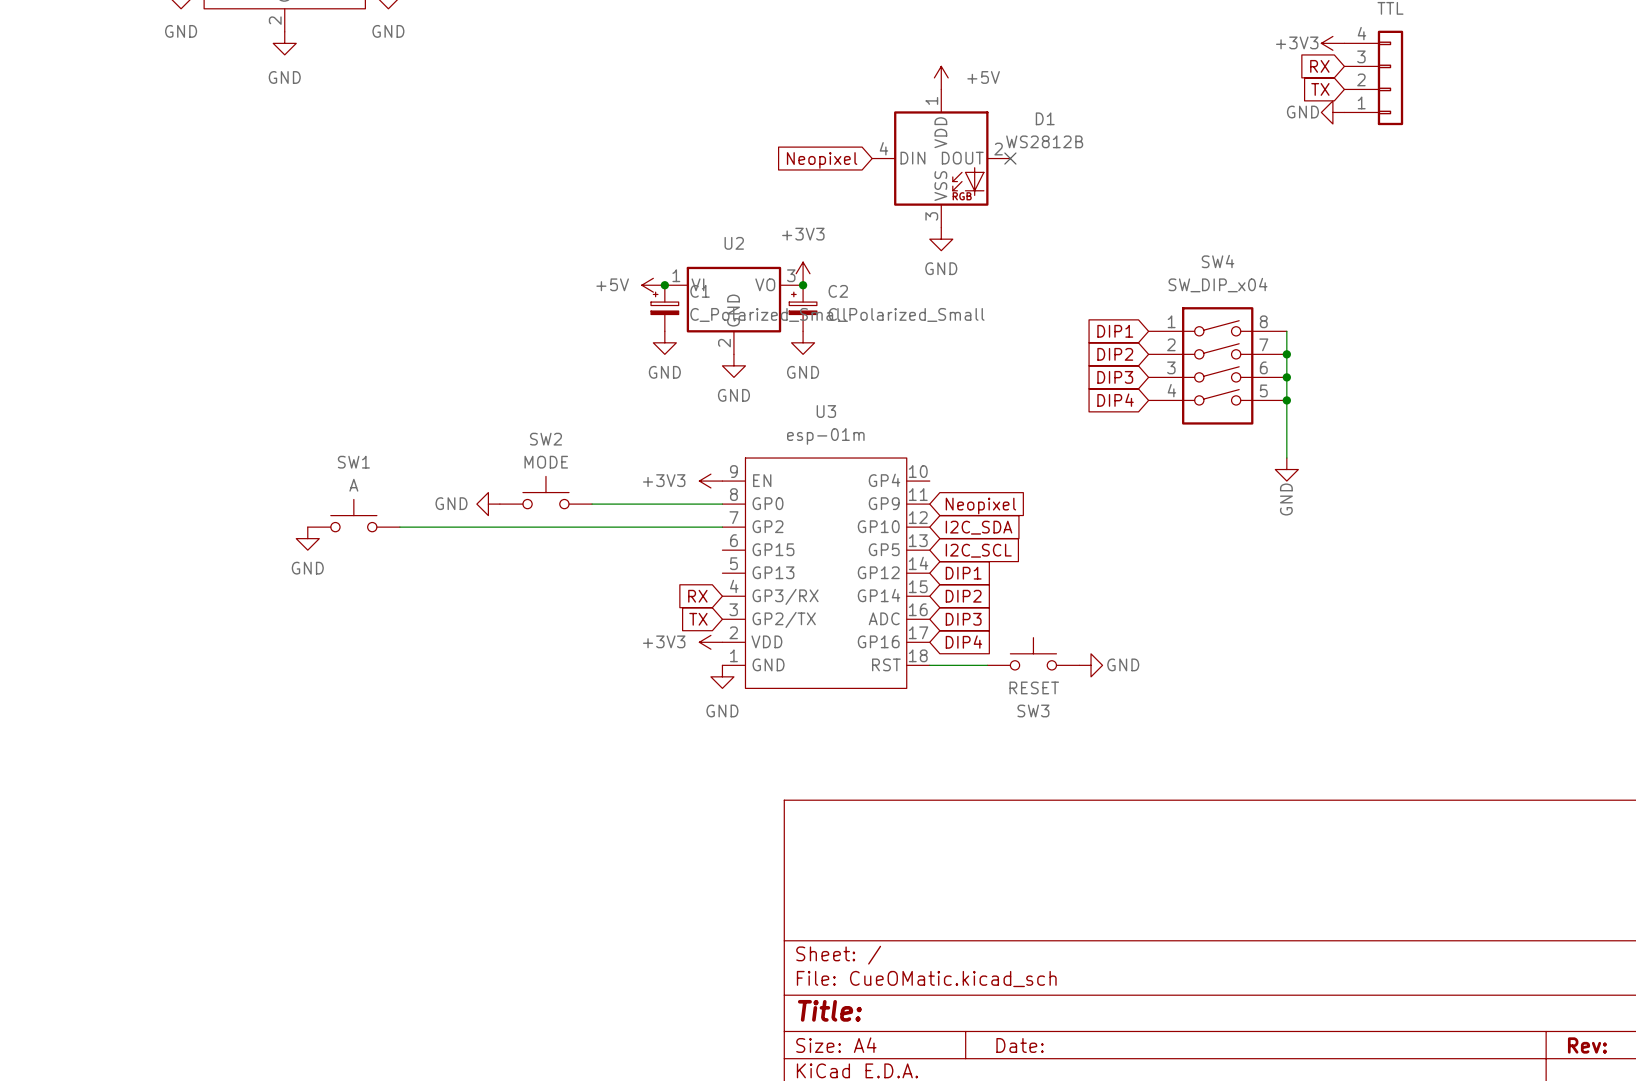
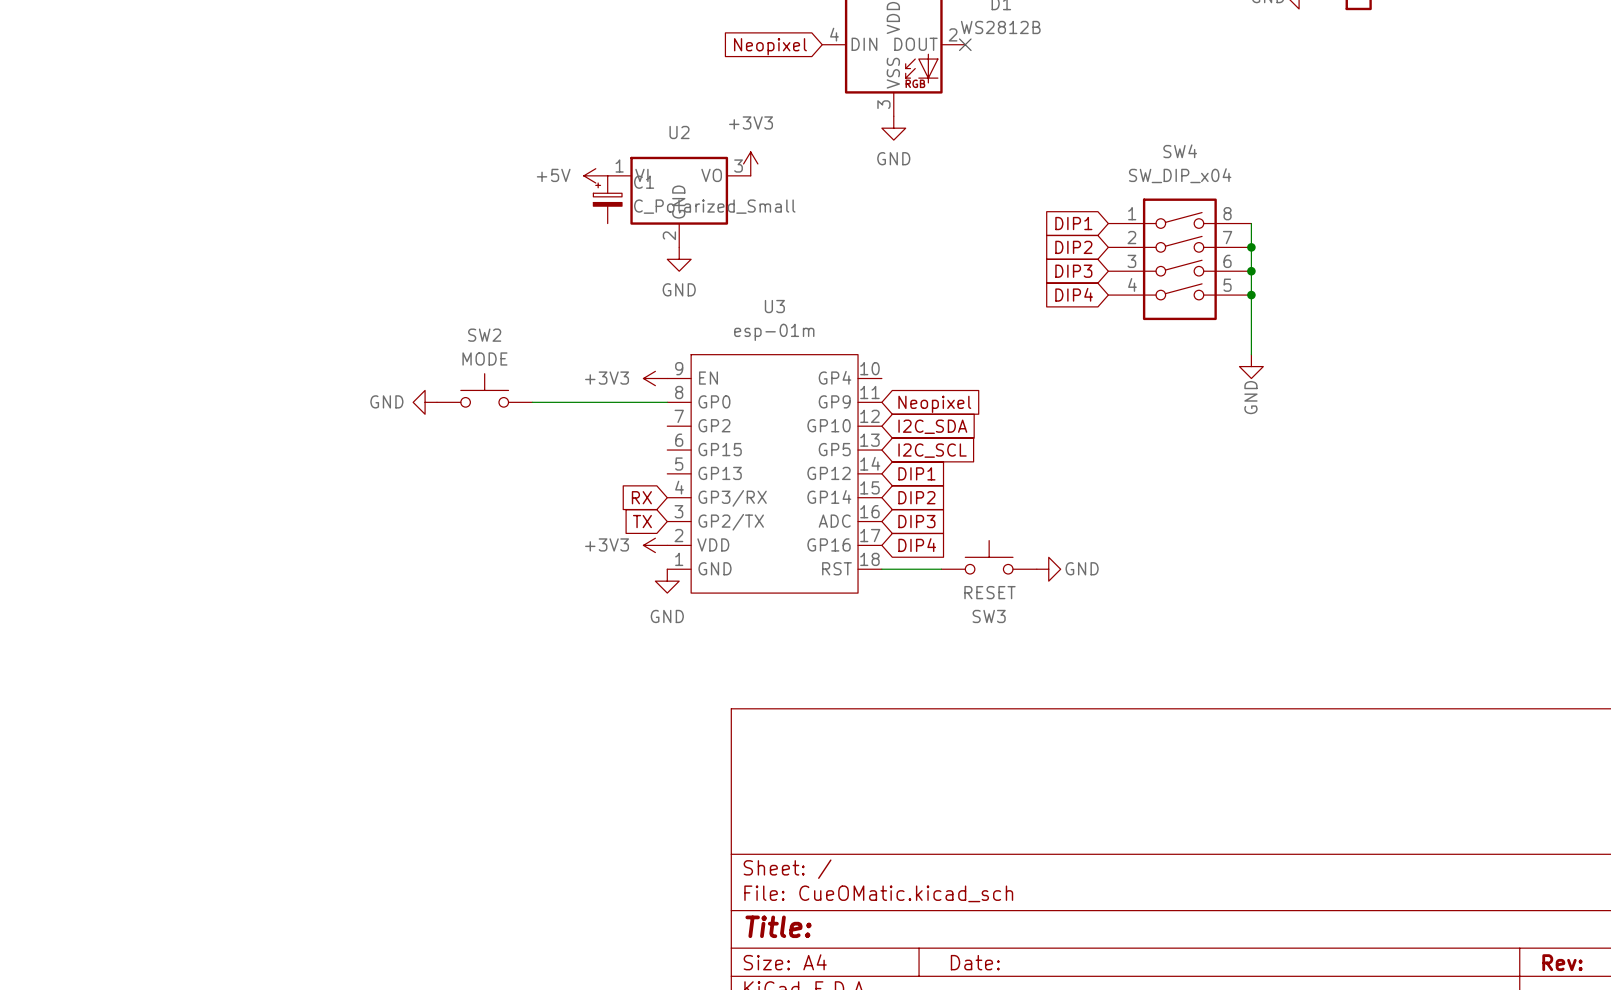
junction: (664, 285) -> none
junction: (803, 285) -> none
C2: C_Polarized_Small (803, 308) -> none
power symbol: GND (664, 342) -> none
power symbol: GND (803, 342) -> none
SW1: A (353, 515) -> none
wire: (399, 527) (722, 527) -> none
power symbol: GND (307, 538) -> none

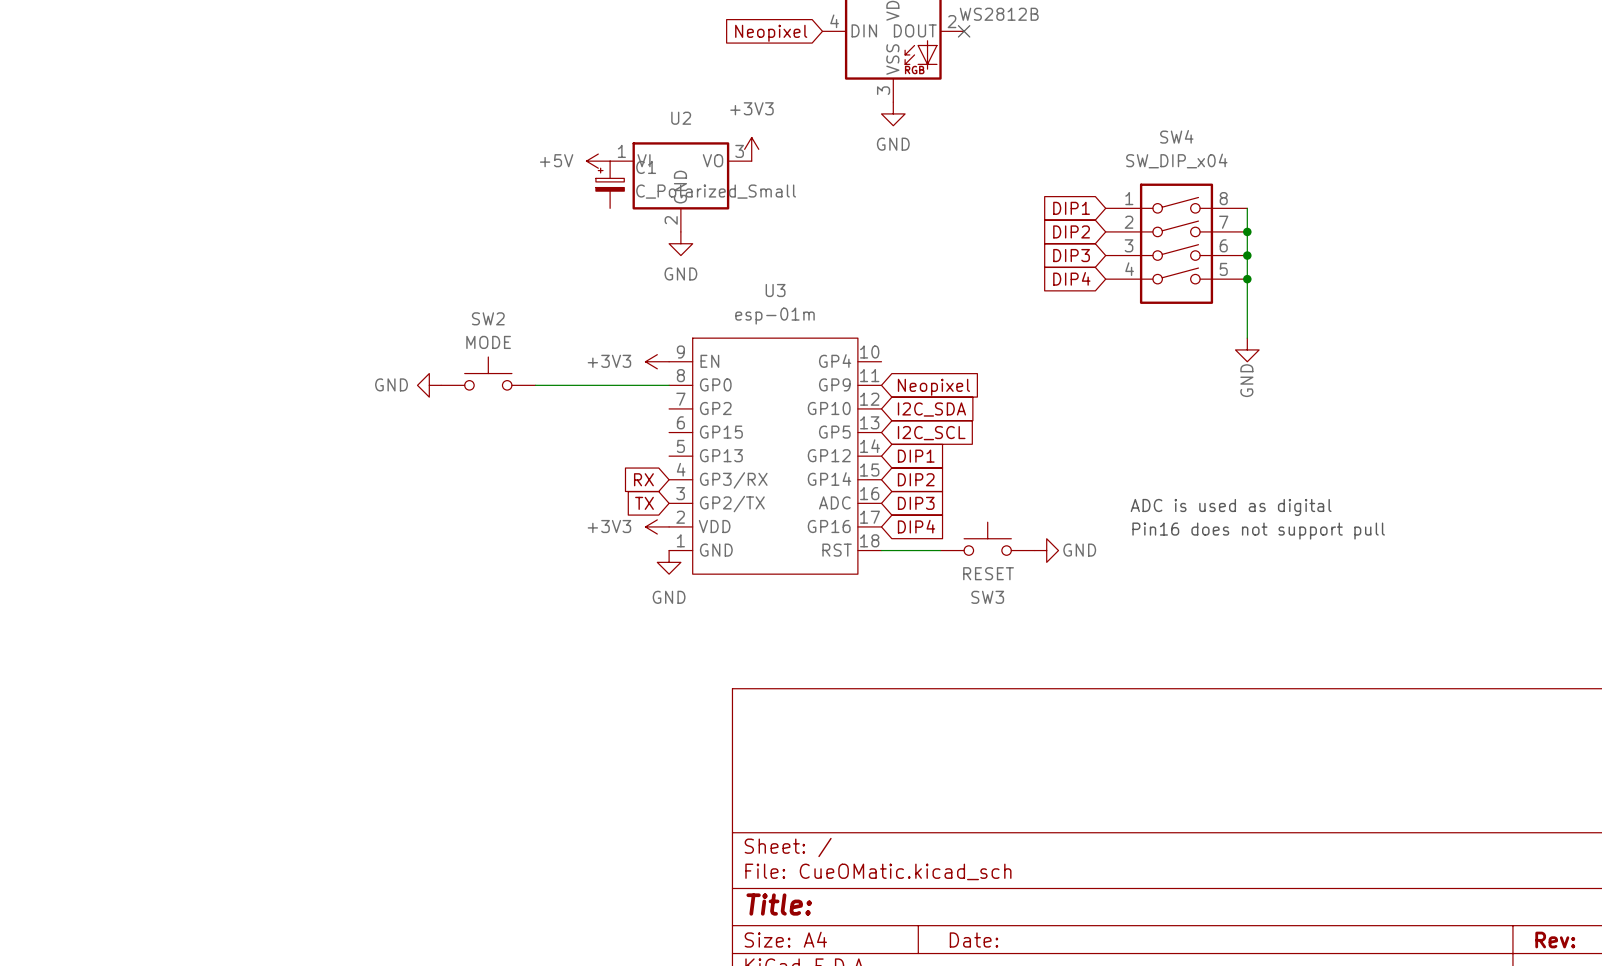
text: none -> ADC is used as digital (1231, 507)
text: none -> Pin16 does not support pull (1258, 531)

